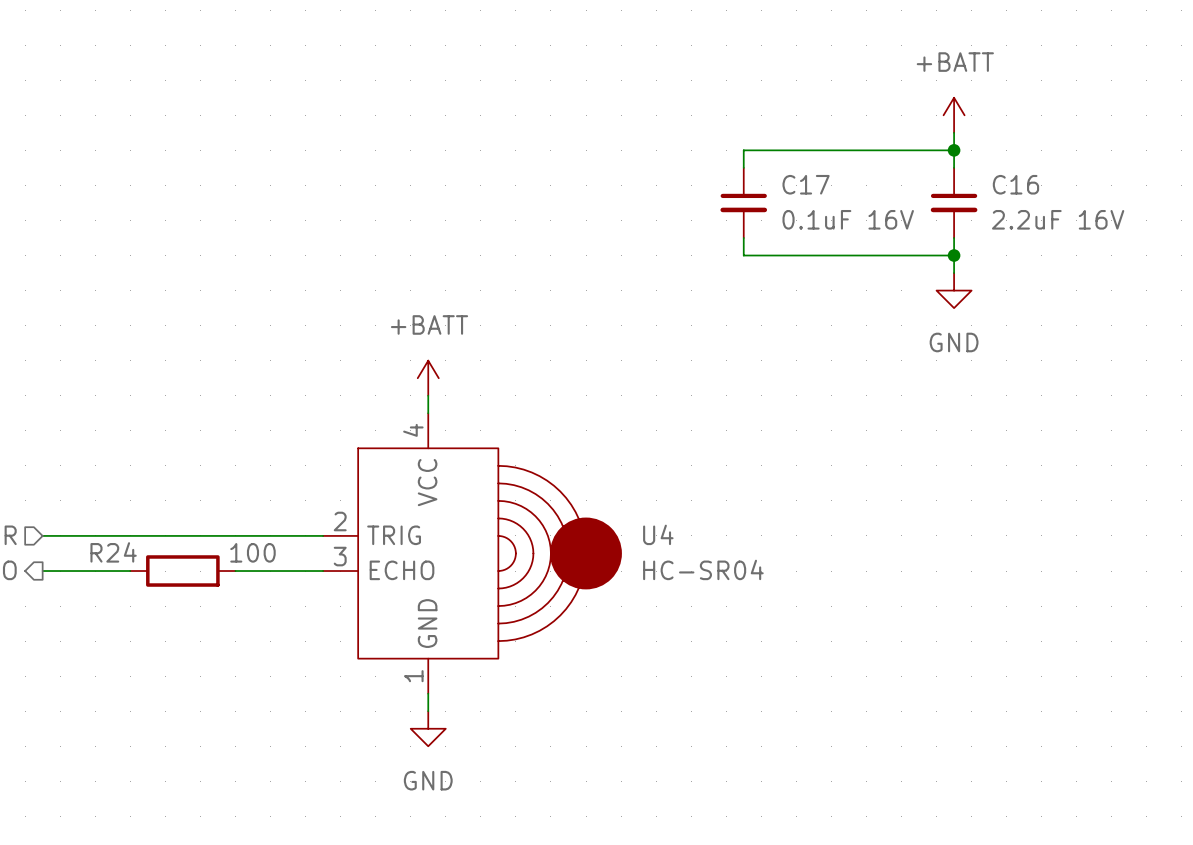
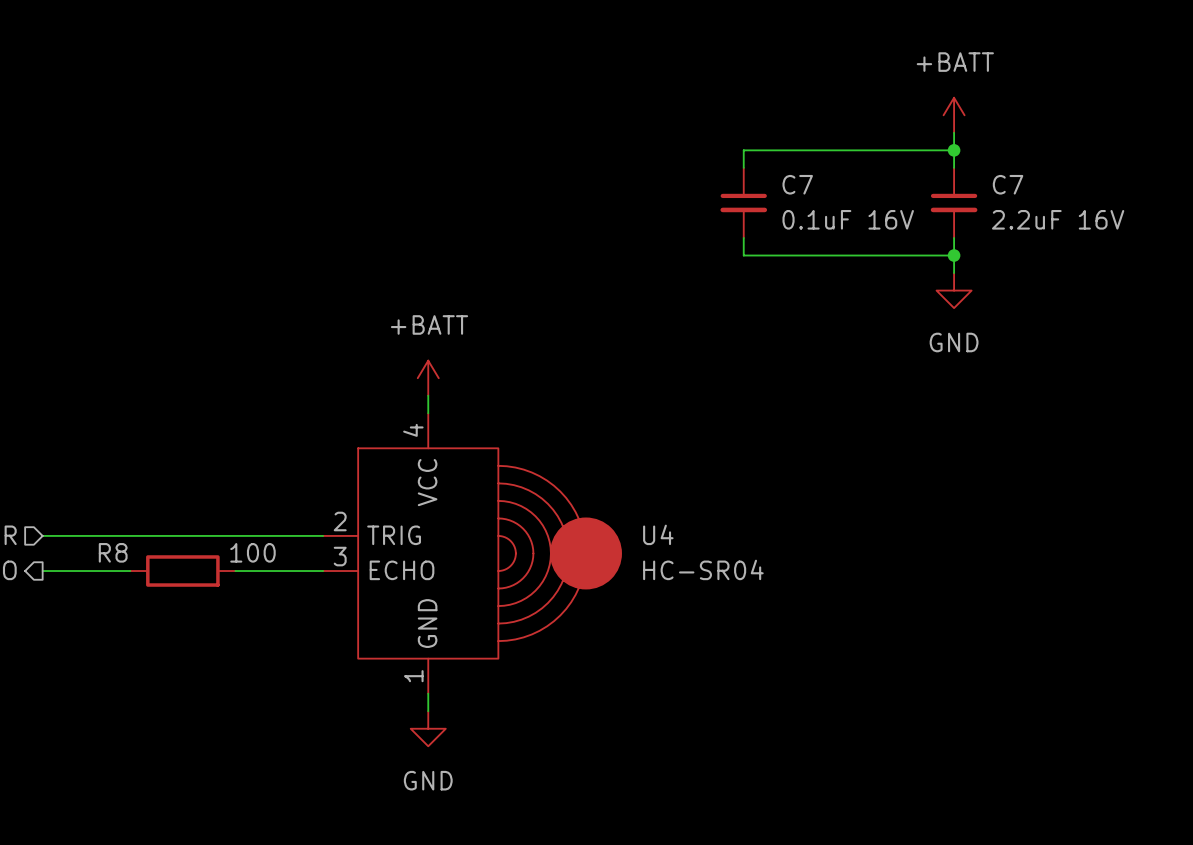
C17 name: C17 (806, 184) -> C7 (797, 184)
C16 name: C16 (1015, 184) -> C7 (1008, 184)
R24 name: R24 (113, 552) -> R8 (113, 552)

